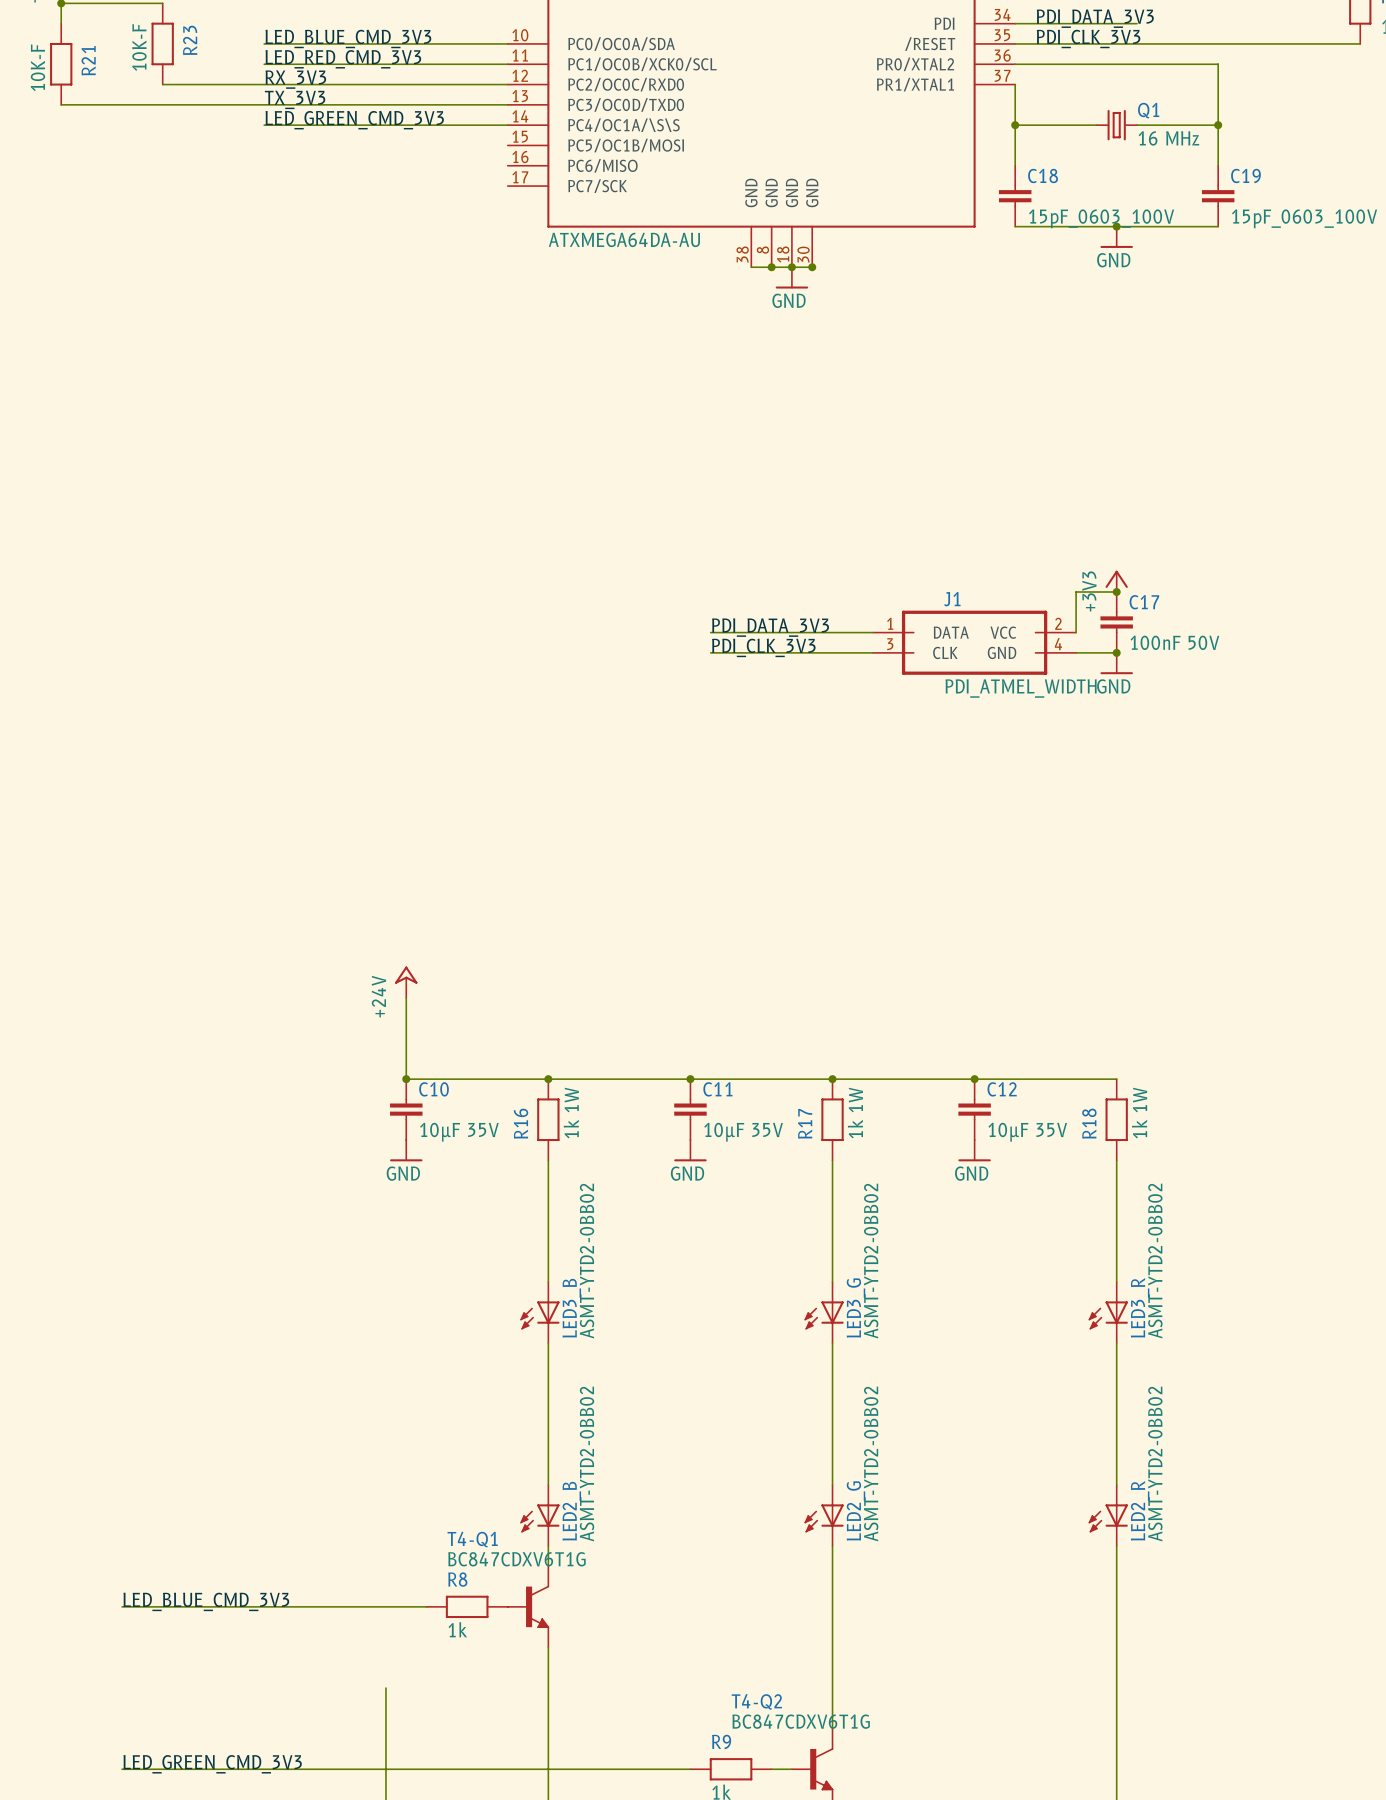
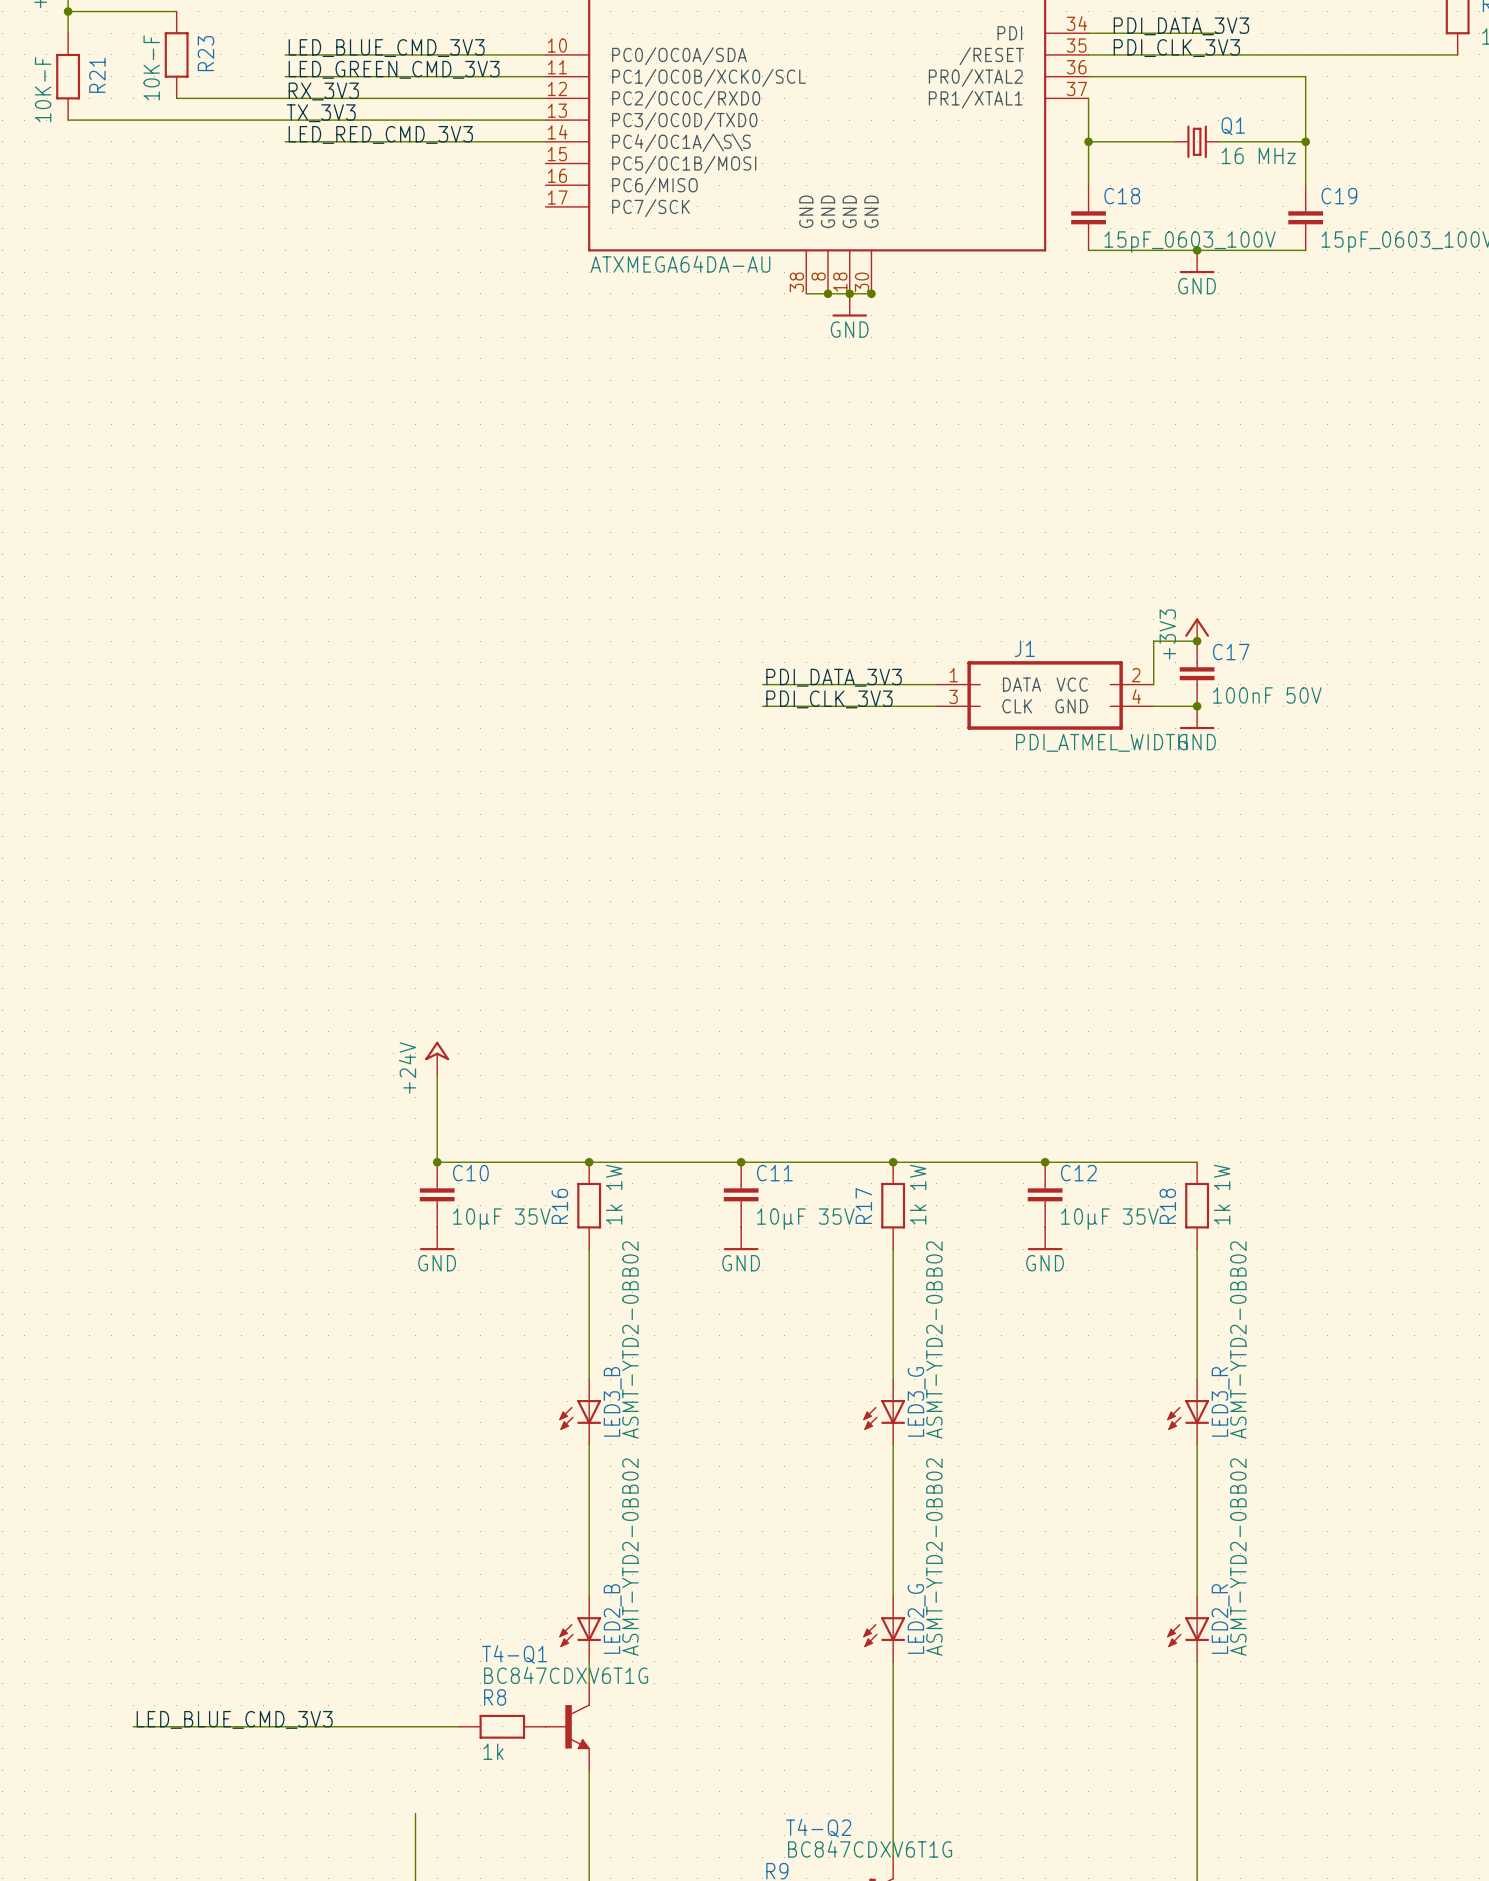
label: LED_RED_CMD_3V3 (343, 59) -> LED_GREEN_CMD_3V3 (394, 69)
label: LED_GREEN_CMD_3V3 (354, 120) -> LED_RED_CMD_3V3 (380, 134)

